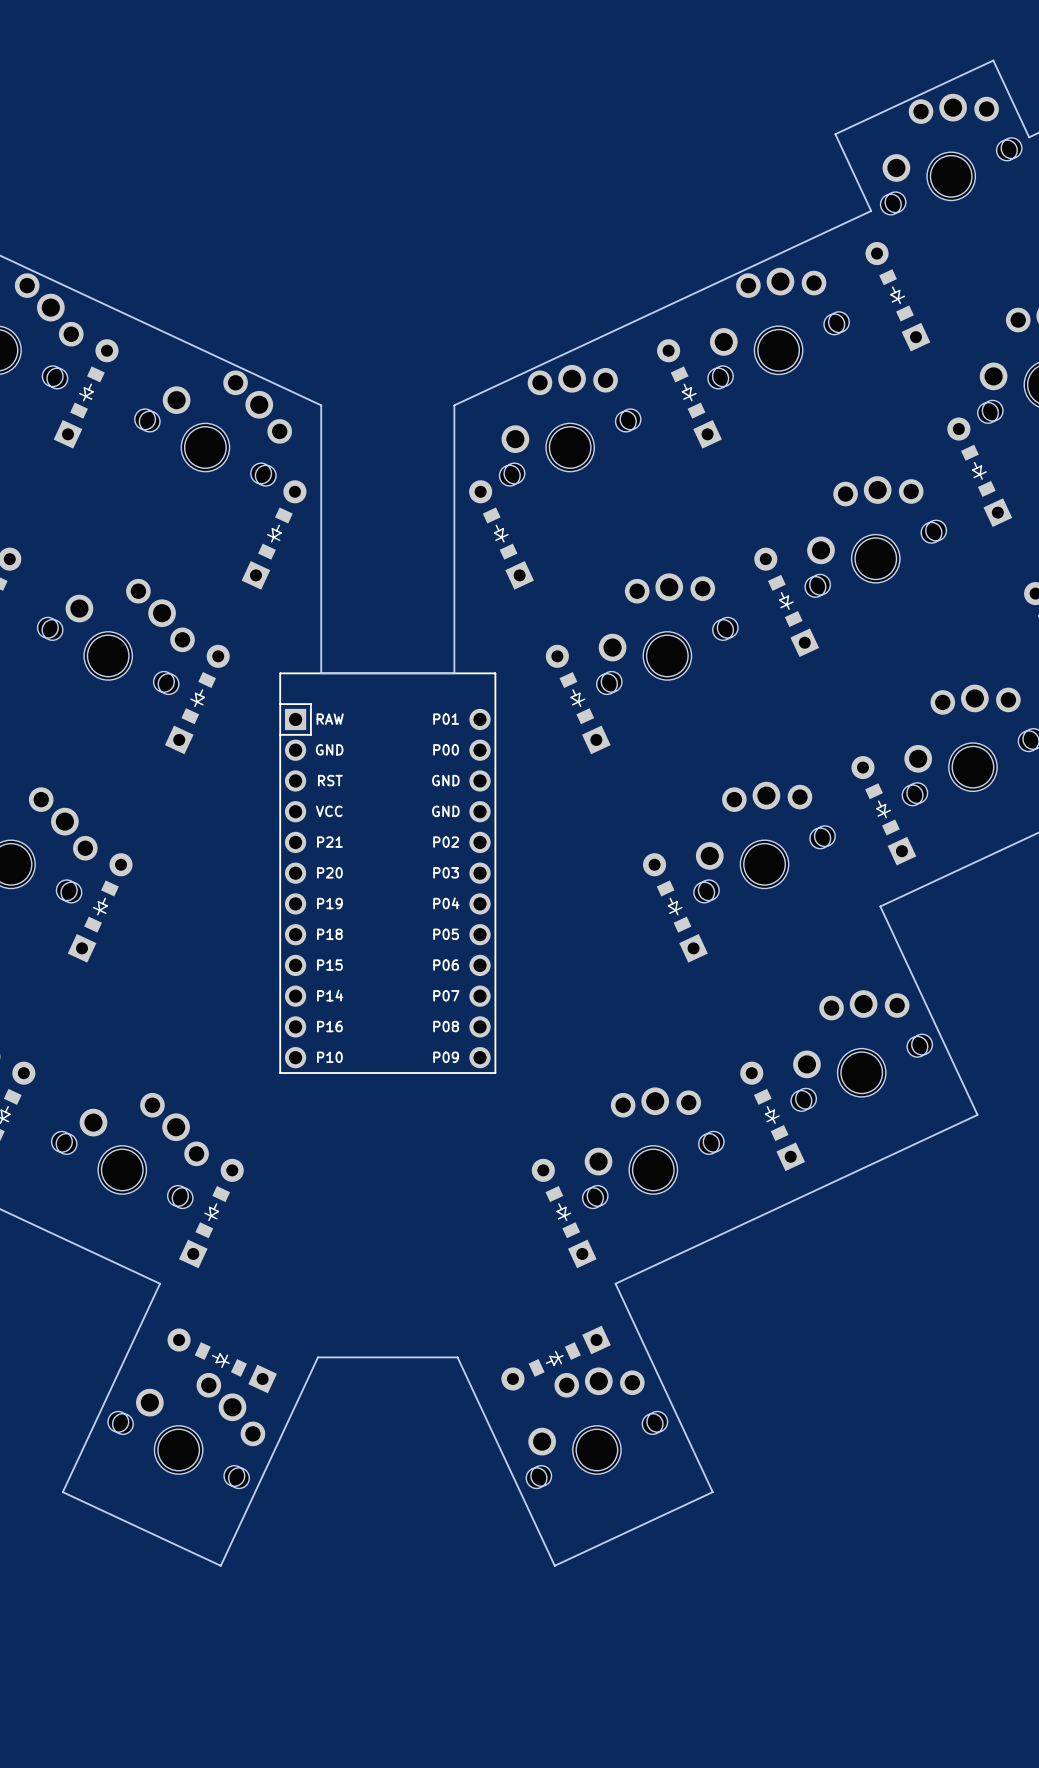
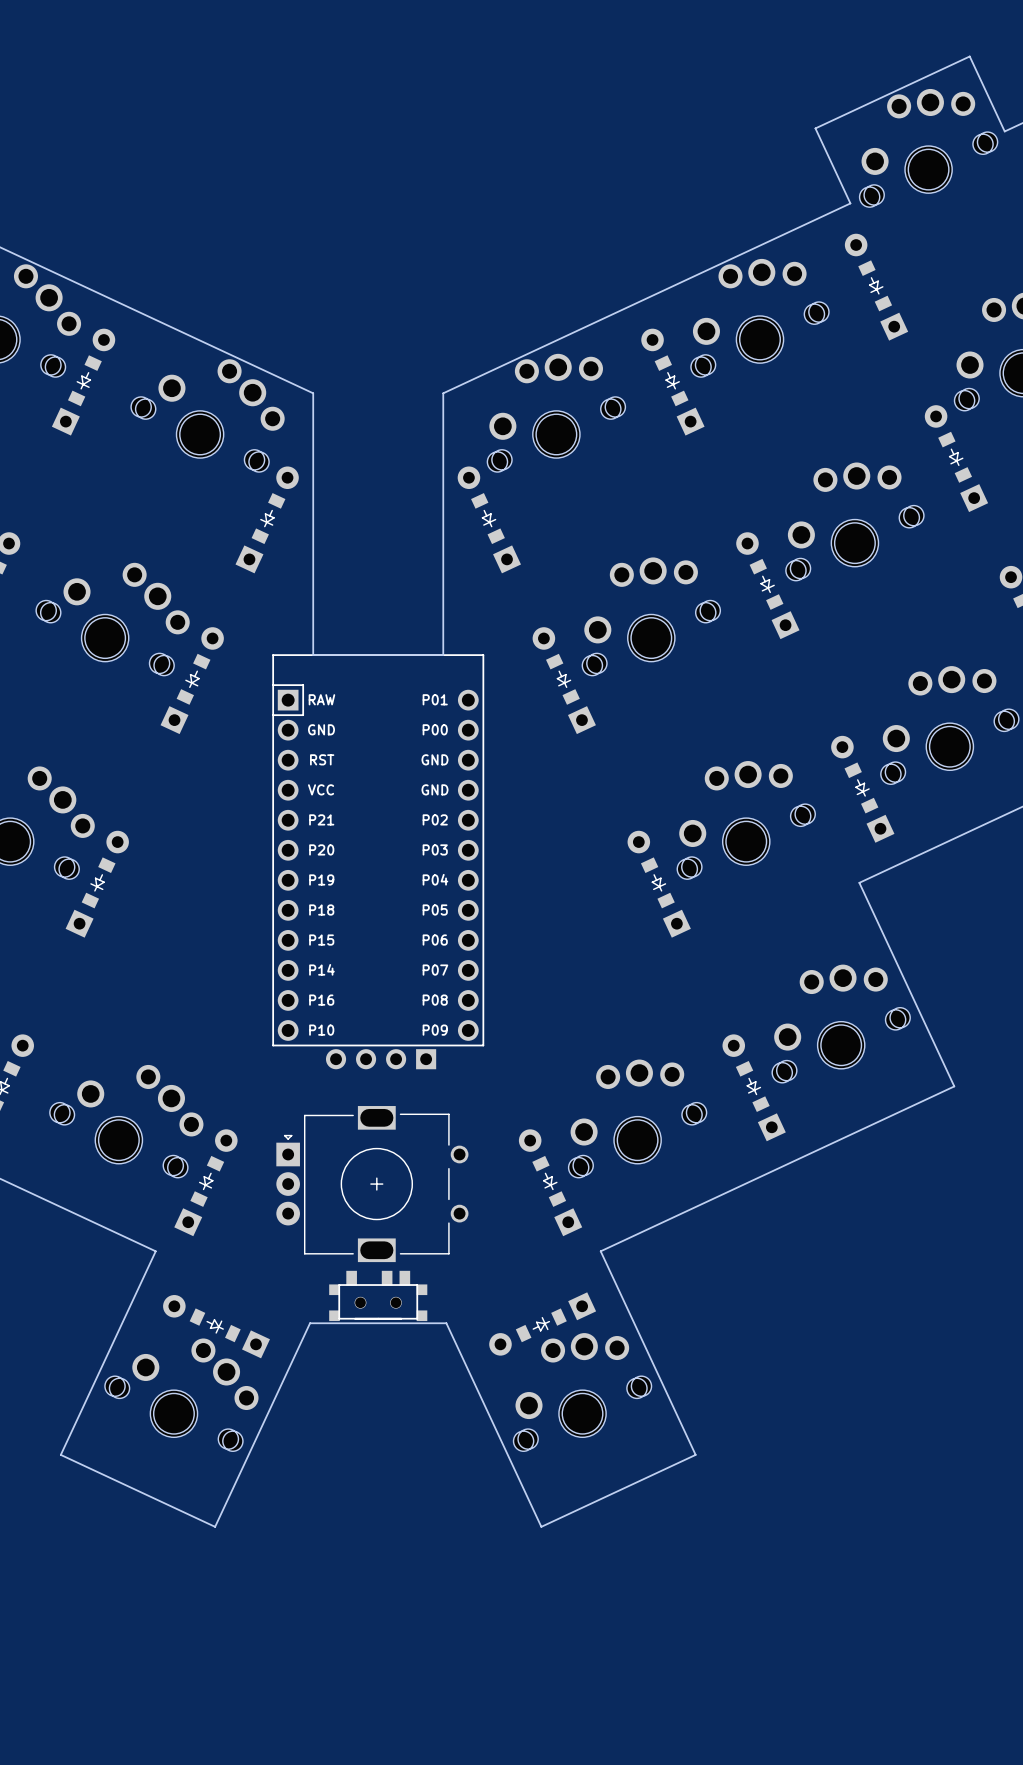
part: none -> (381, 1059)
part: none -> (372, 1184)
part: none -> (378, 1295)

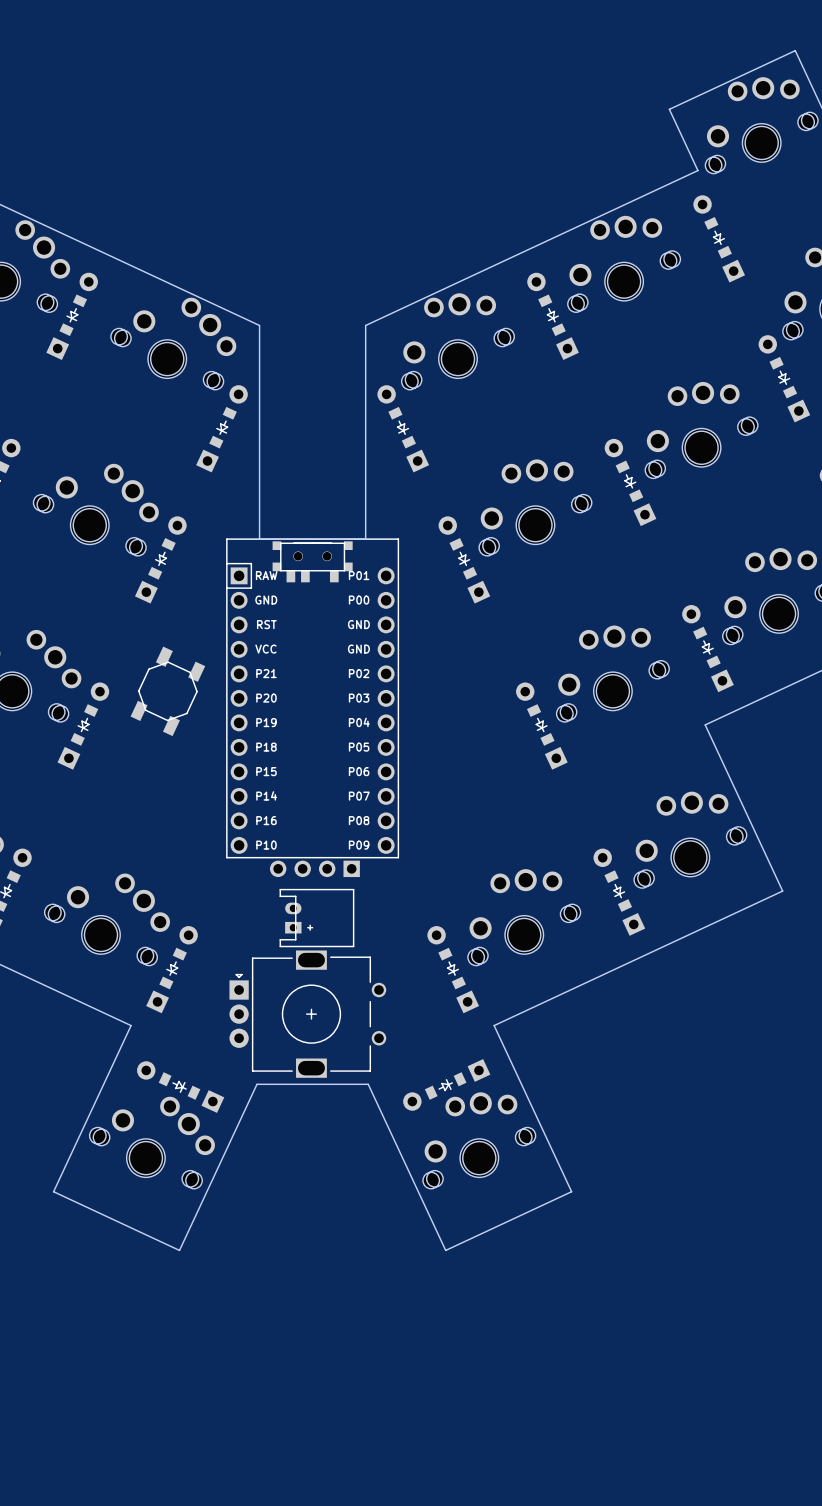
part: none -> (312, 561)
part: none -> (167, 691)
part: none -> (316, 918)
part position: (372, 1184) -> (307, 1014)
part: (378, 1295) -> none

